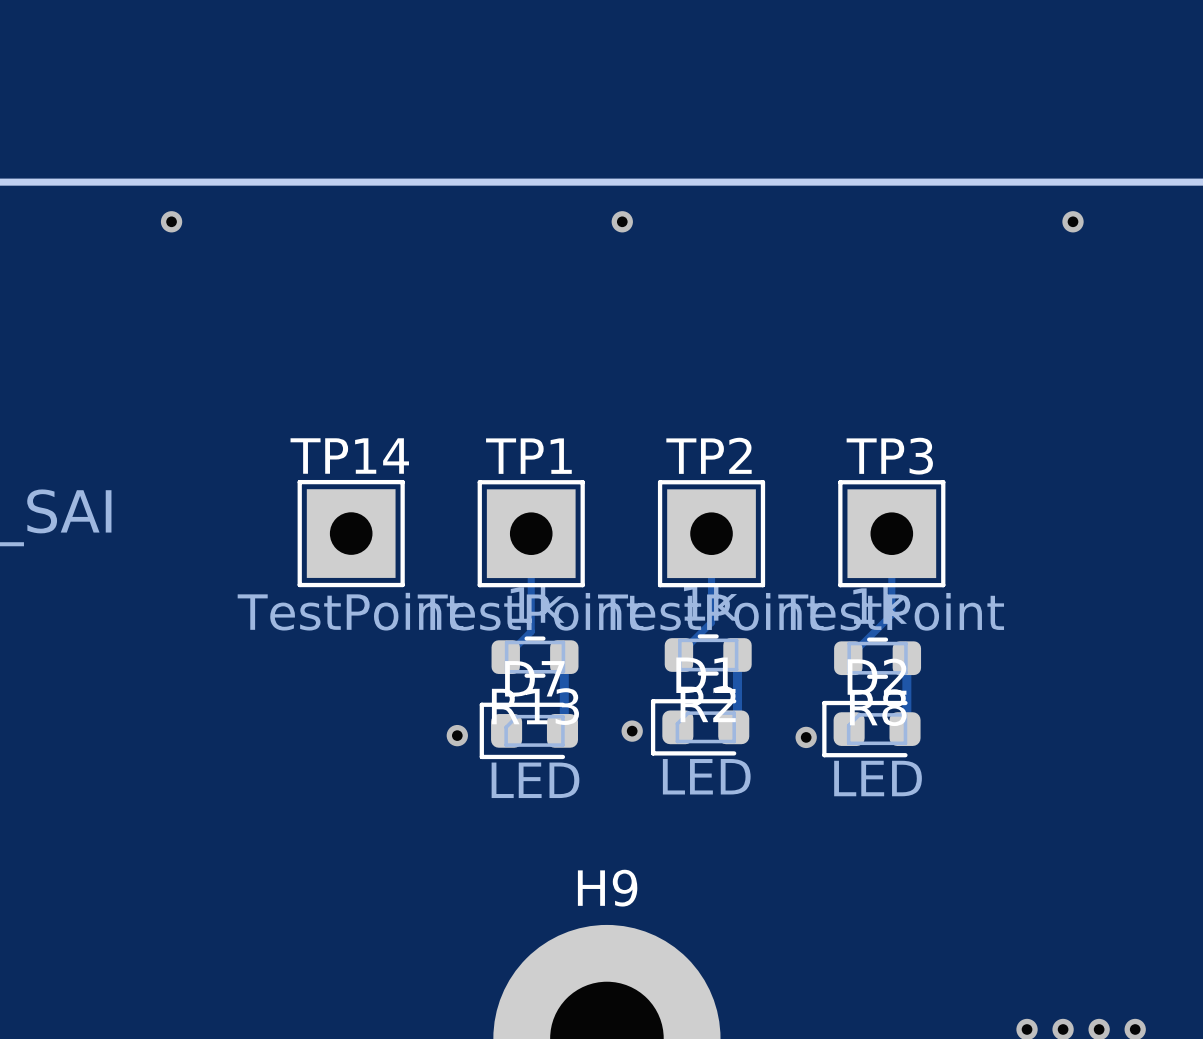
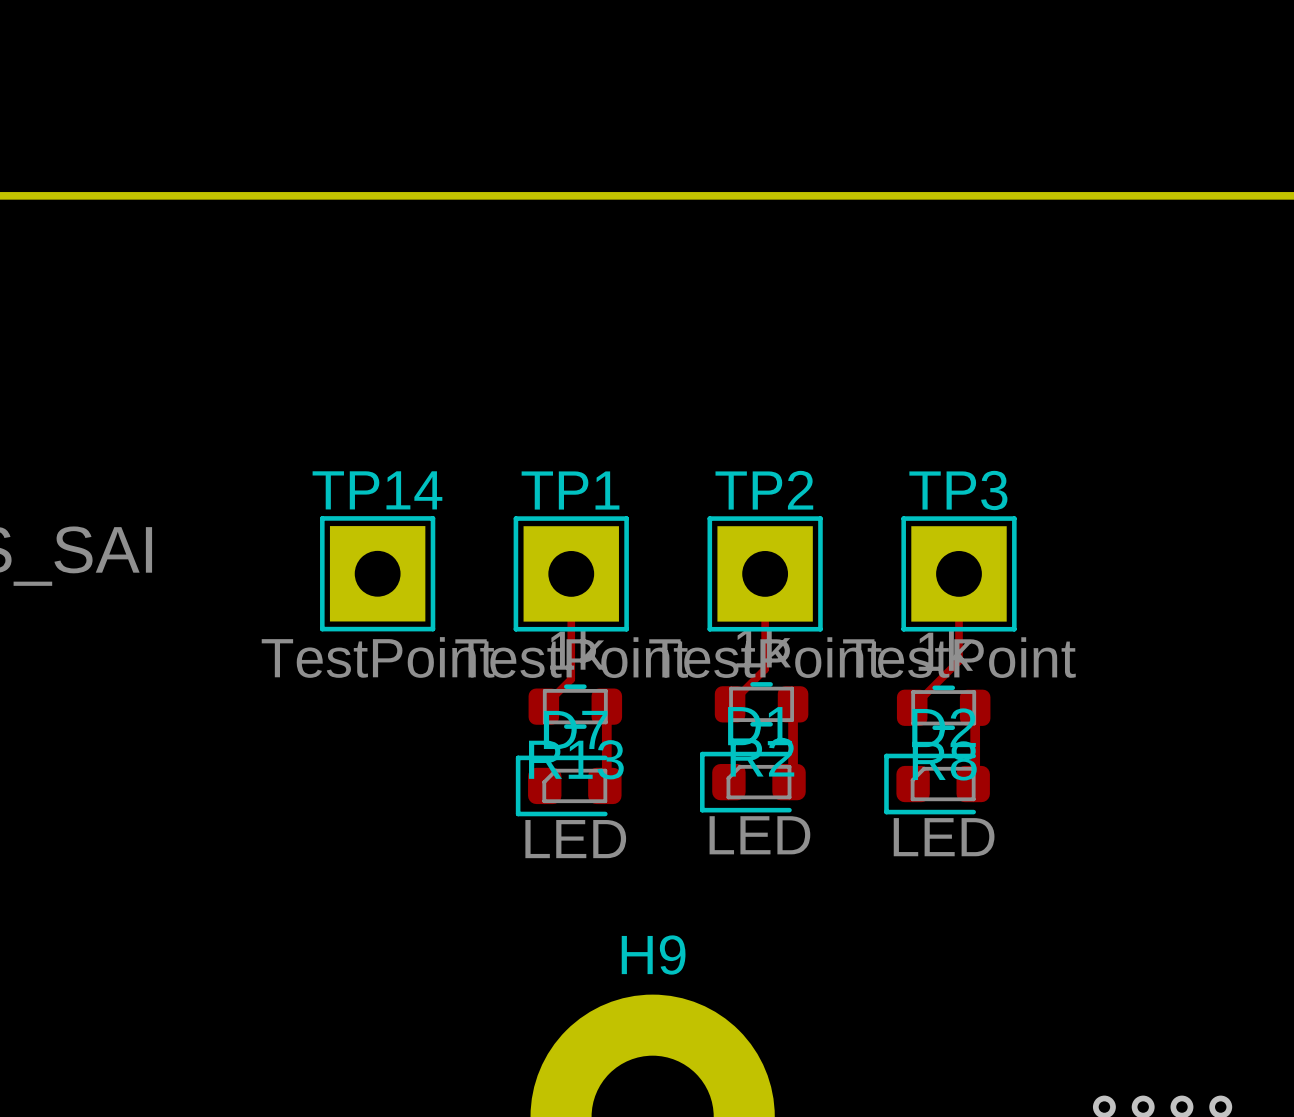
via: (171, 221) -> none
via: (622, 221) -> none
via: (1073, 221) -> none
via: (632, 731) -> none
via: (457, 735) -> none
via: (806, 737) -> none

